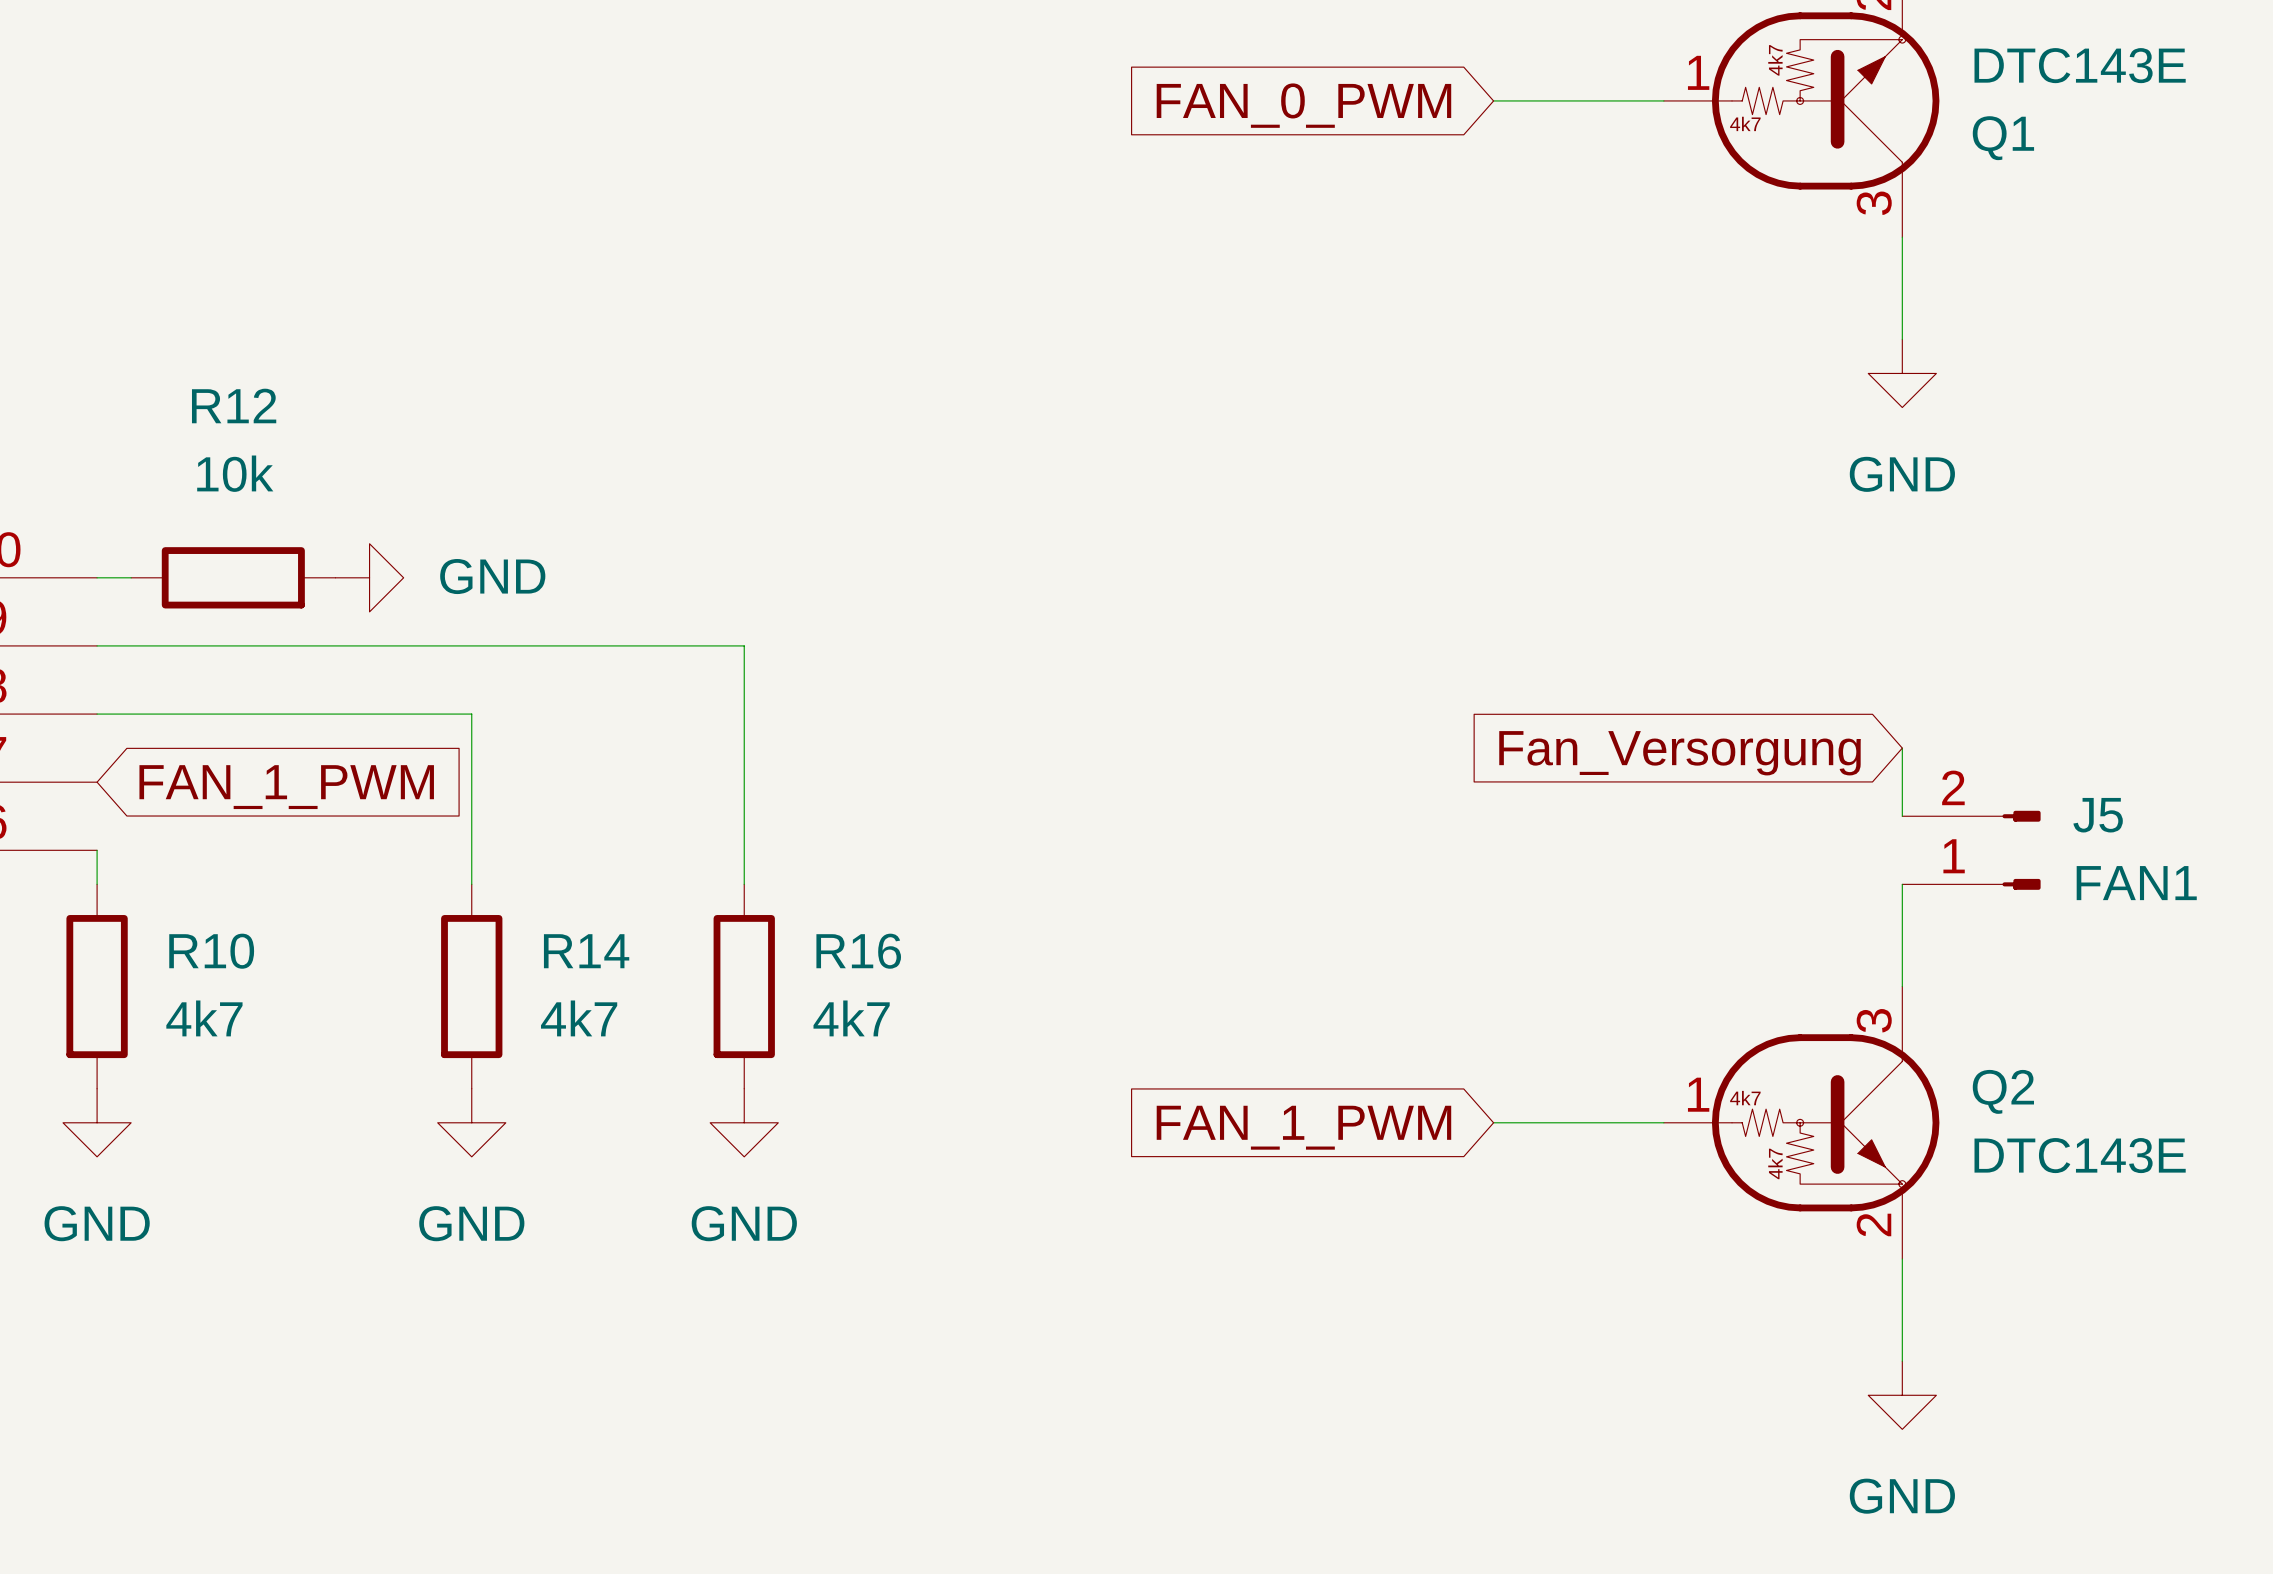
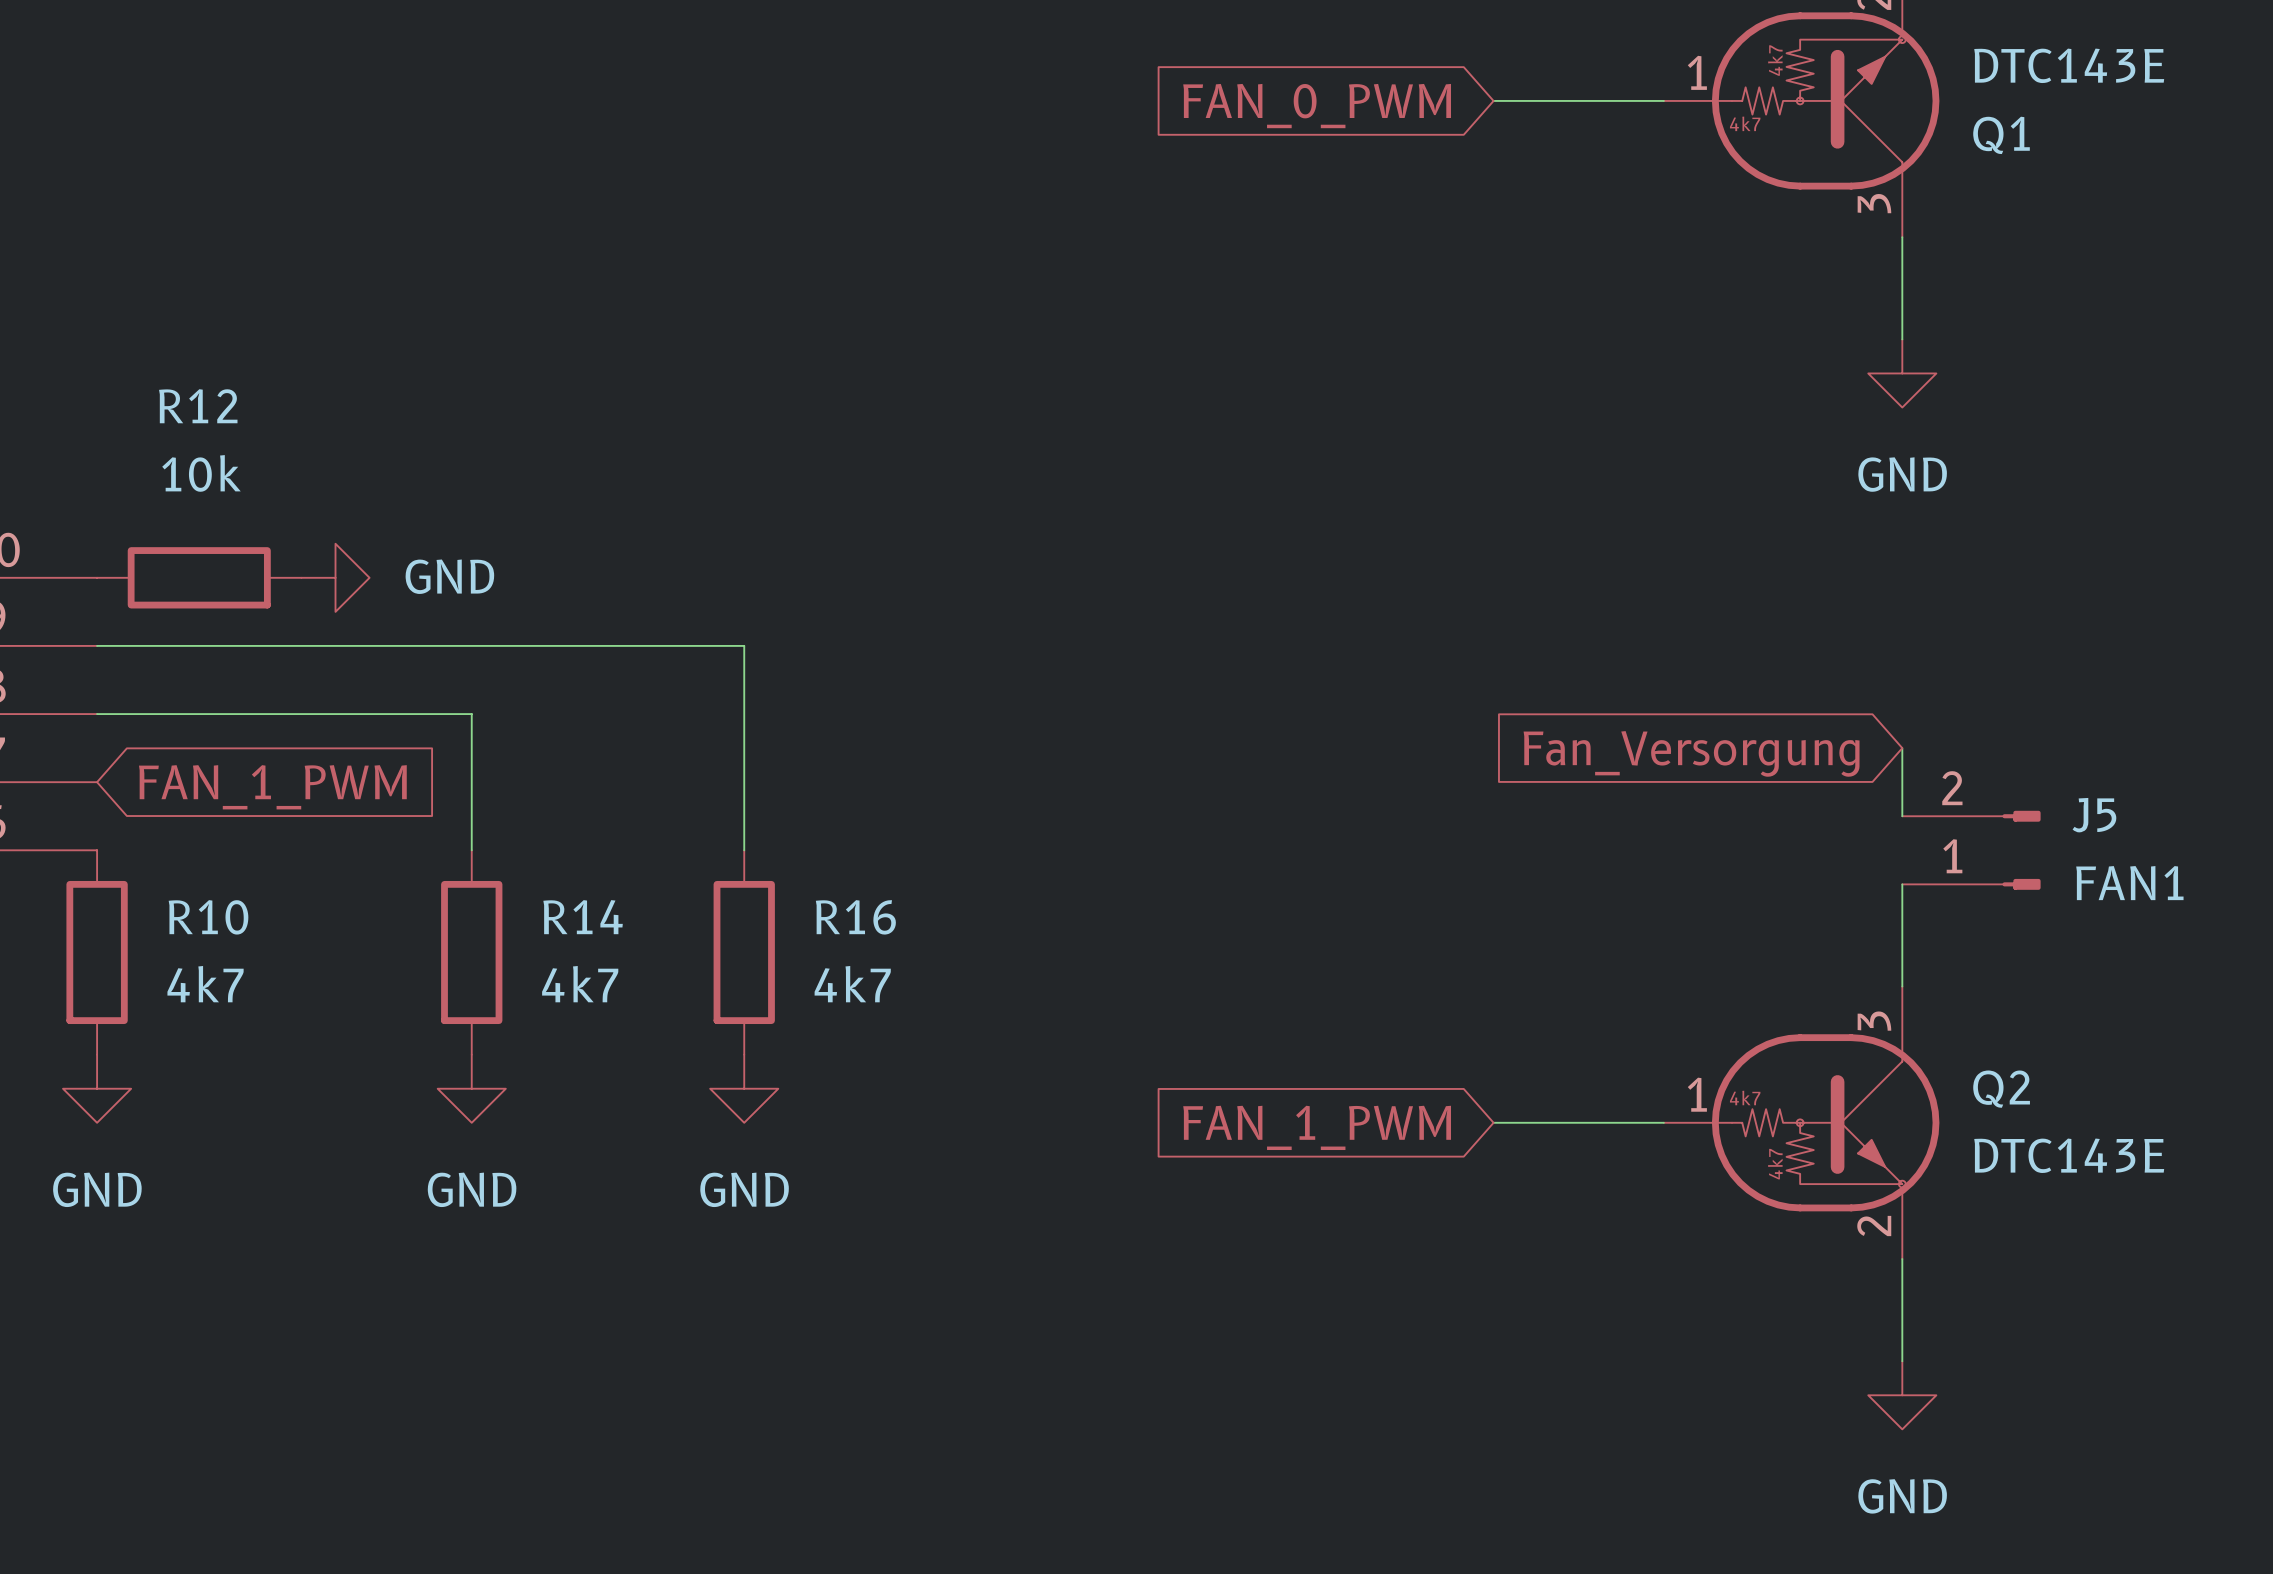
R12 position: (233, 577) -> (199, 577)
power symbol position: GND (369, 577) -> GND (335, 577)
R10 position: (97, 986) -> (97, 952)
R14 position: (471, 986) -> (471, 952)
R16 position: (744, 986) -> (744, 952)
power symbol position: GND (97, 1122) -> GND (97, 1088)
power symbol position: GND (471, 1122) -> GND (471, 1088)
power symbol position: GND (744, 1122) -> GND (744, 1088)

